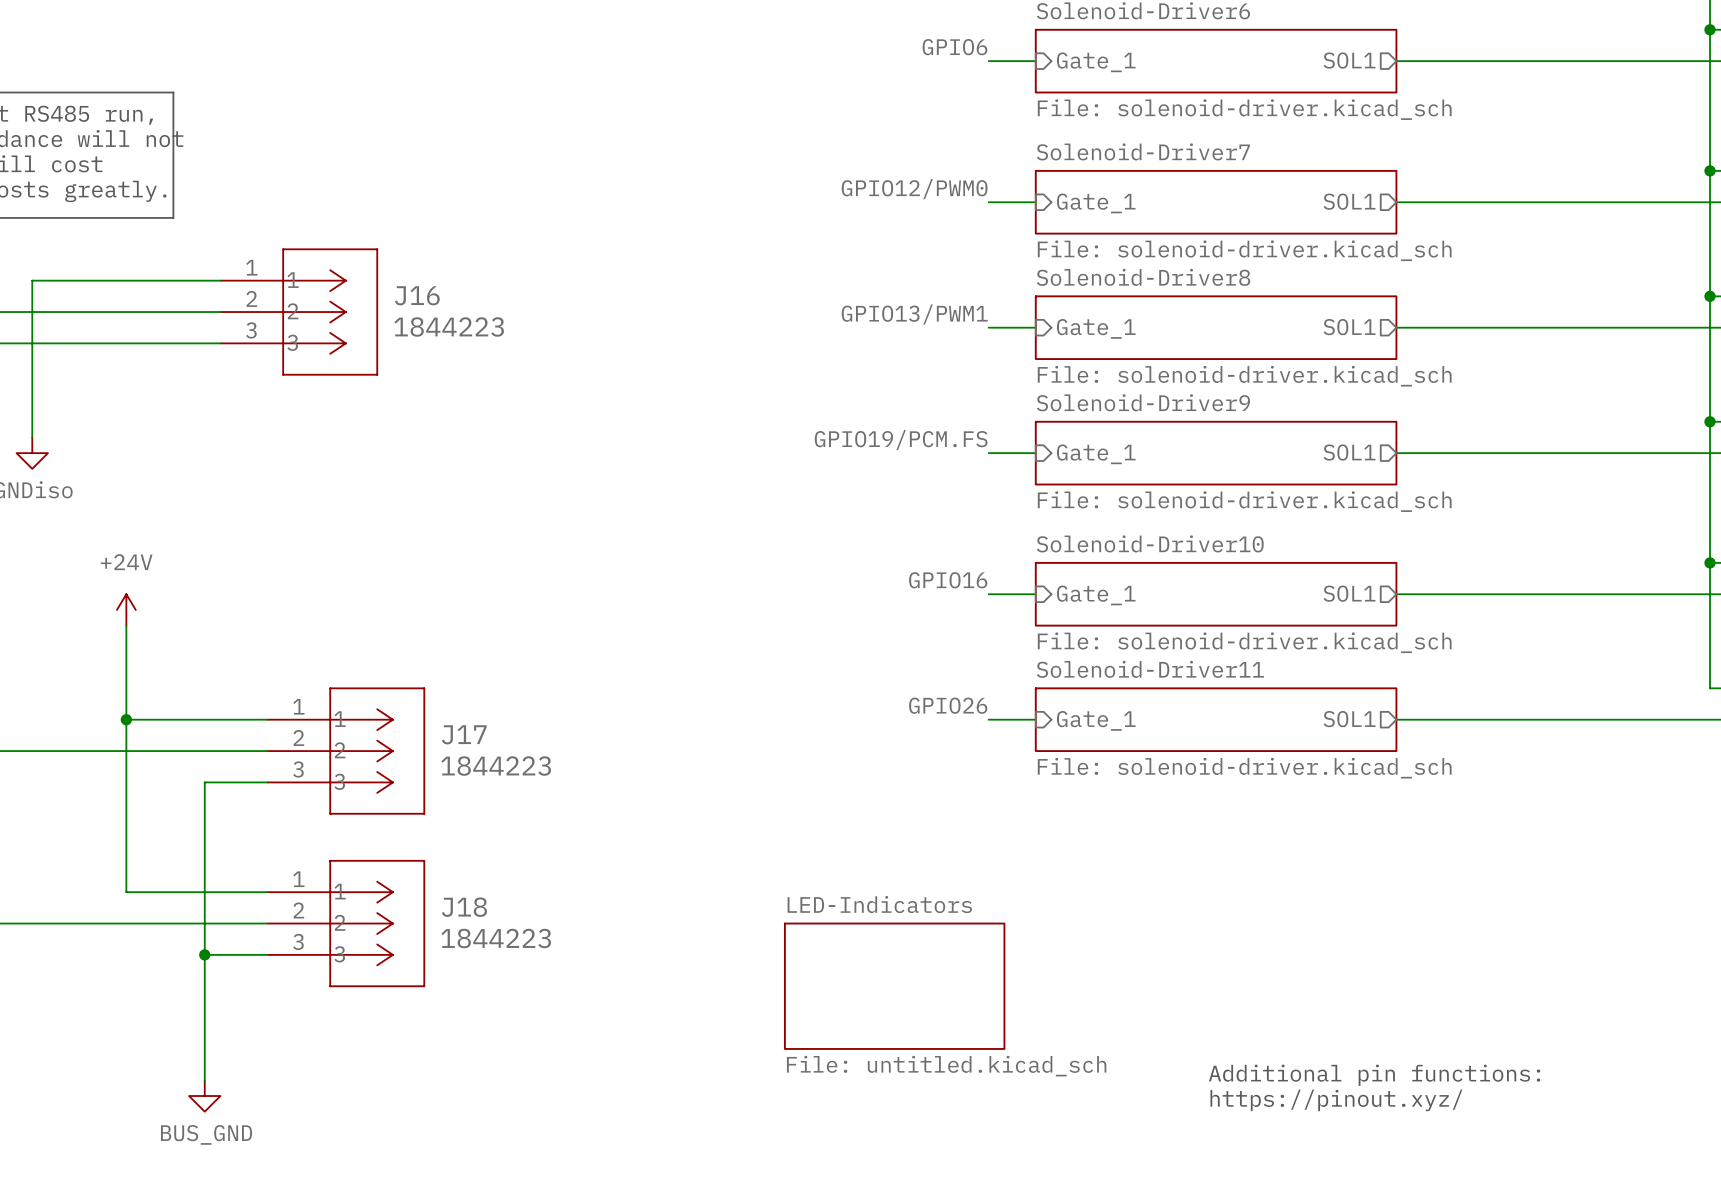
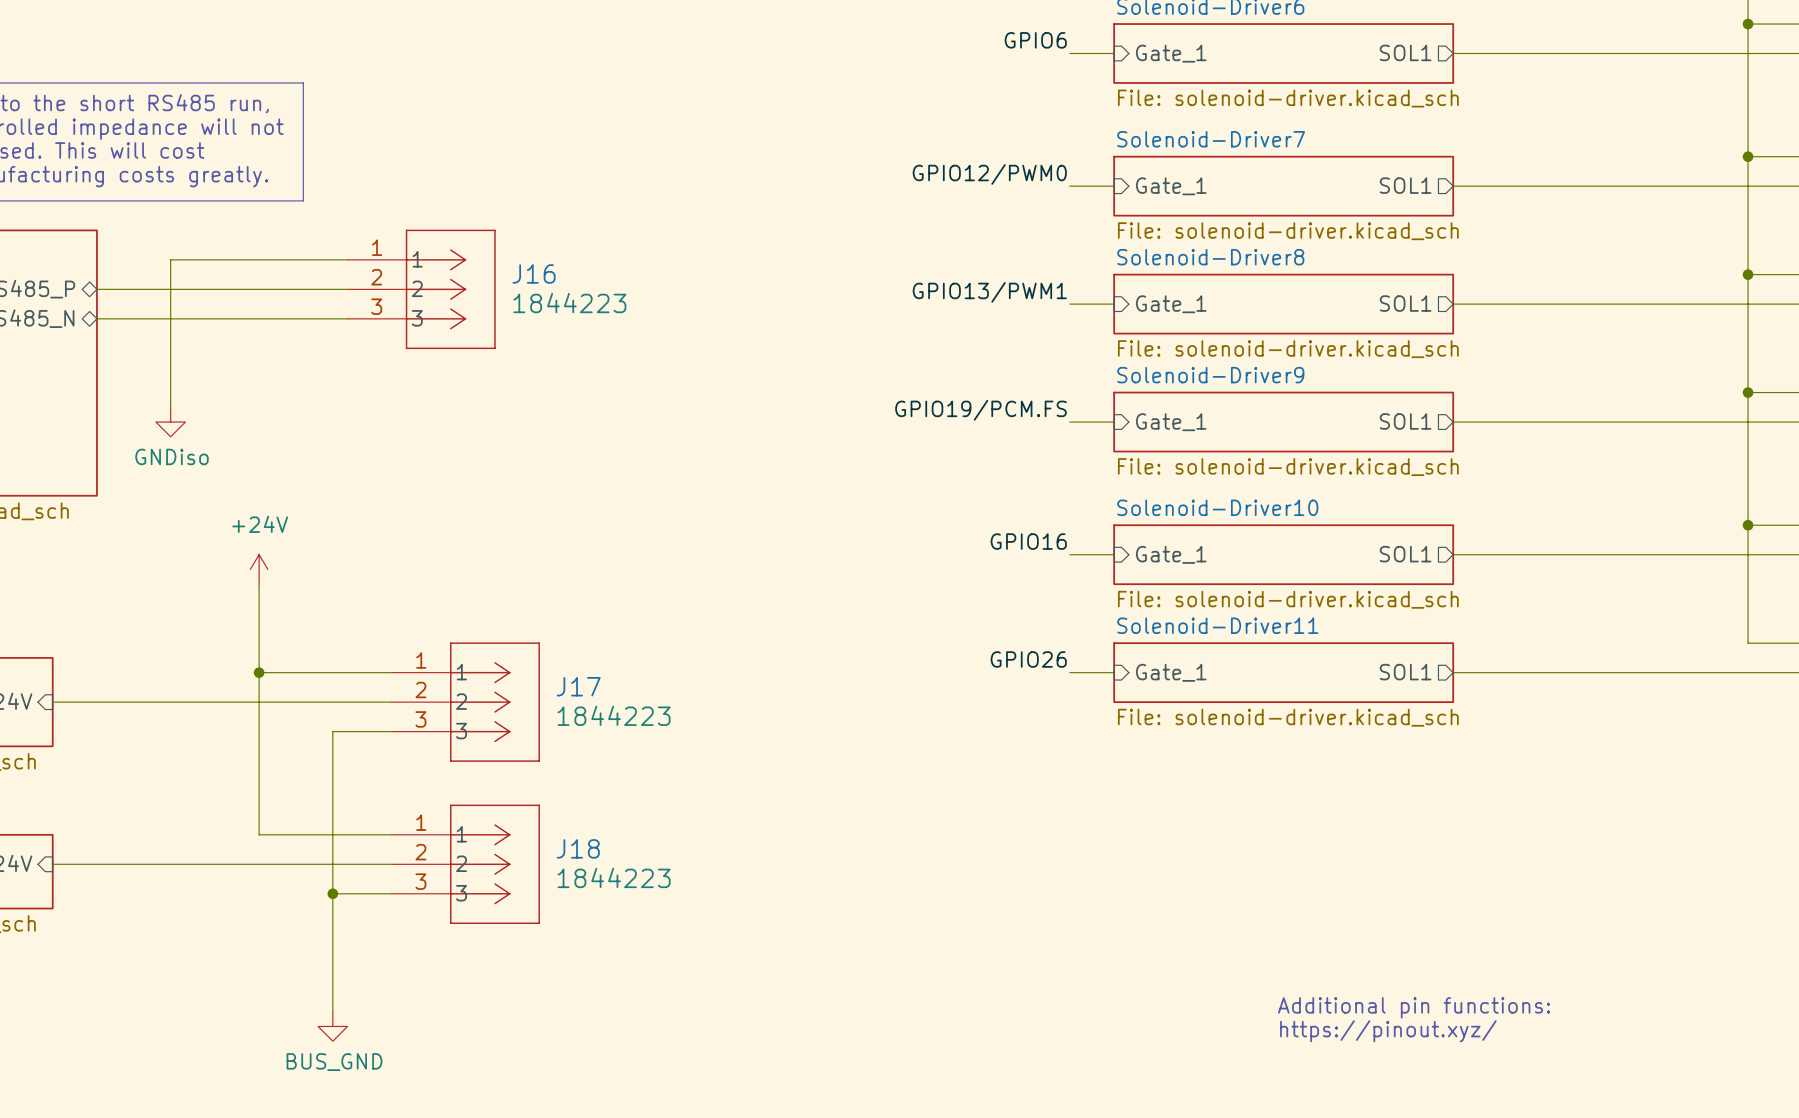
sheet LED-Indicators: File: untitled.kicad_sch (894, 986) -> none

